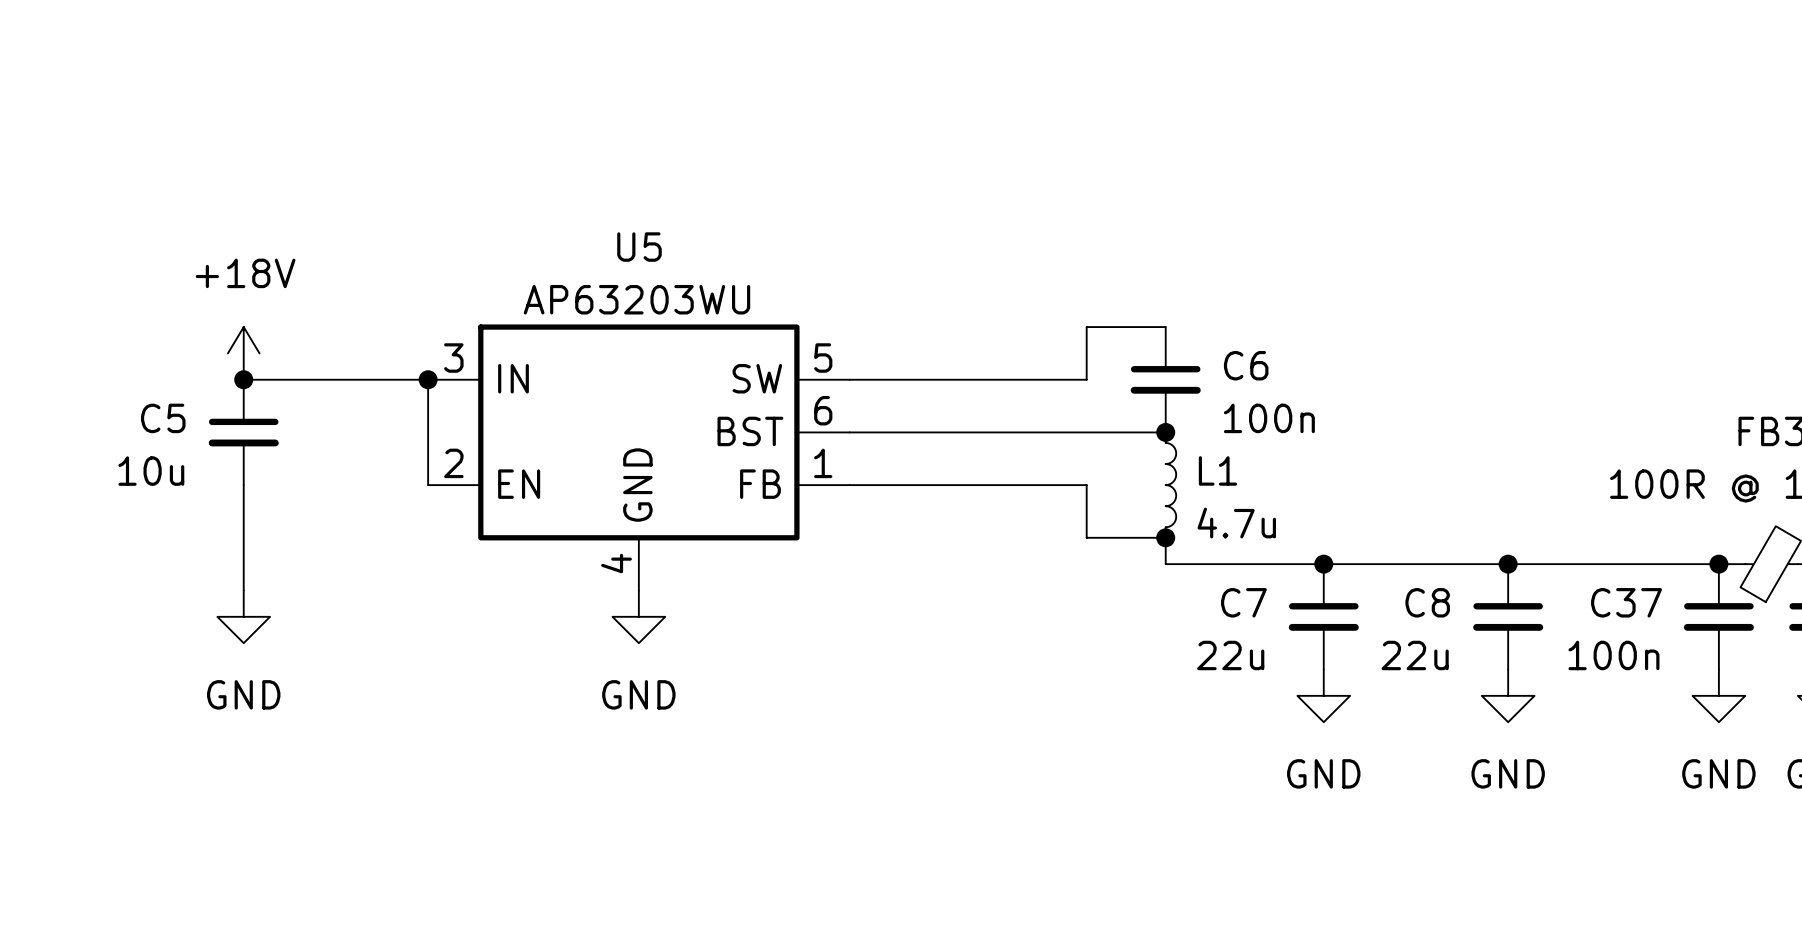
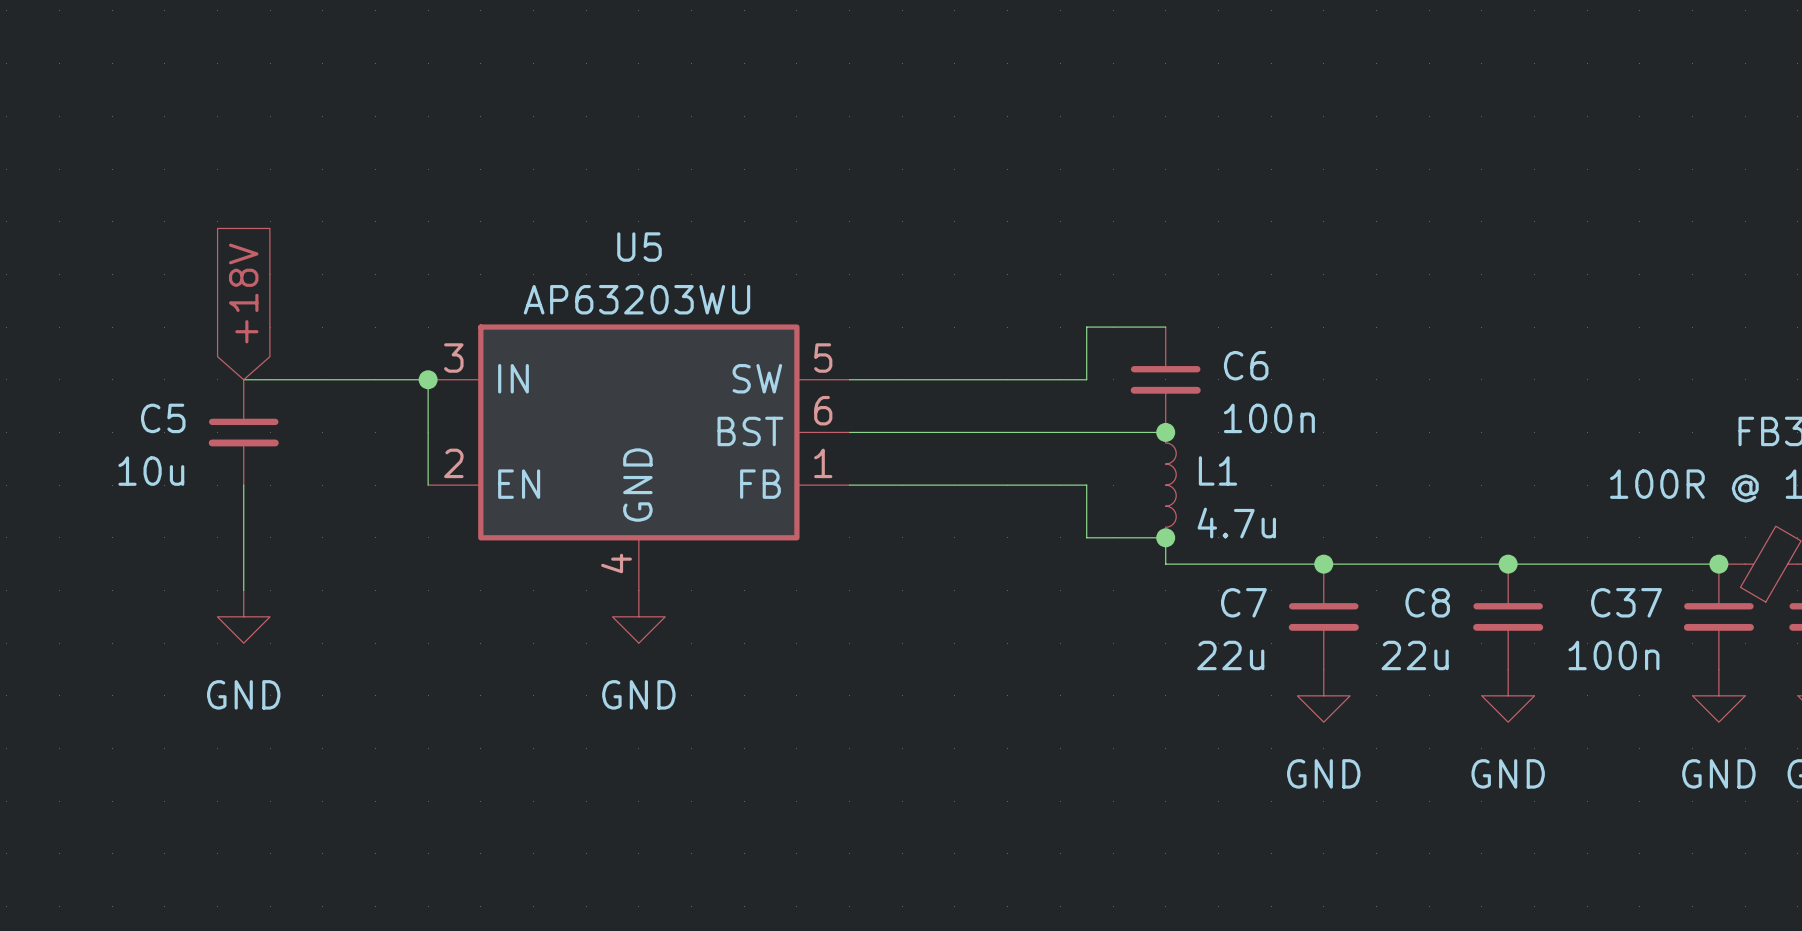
global label: none -> +18V (243, 293)
power symbol: +18V (243, 353) -> none
junction: (243, 379) -> none

